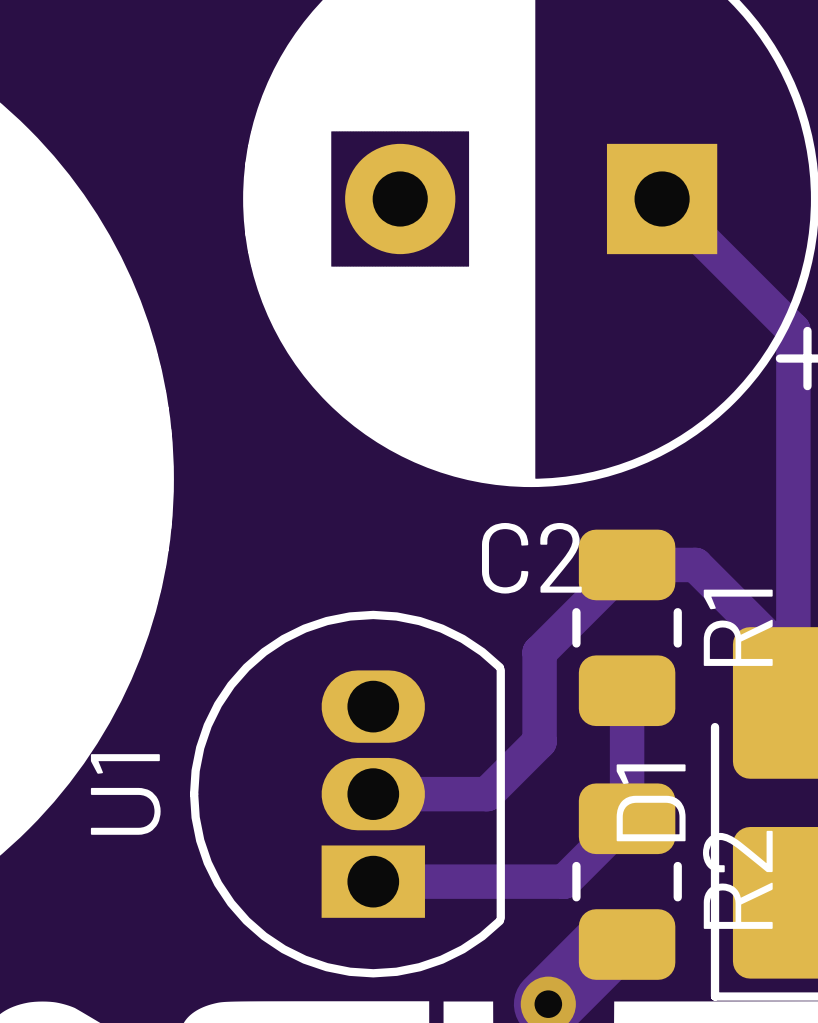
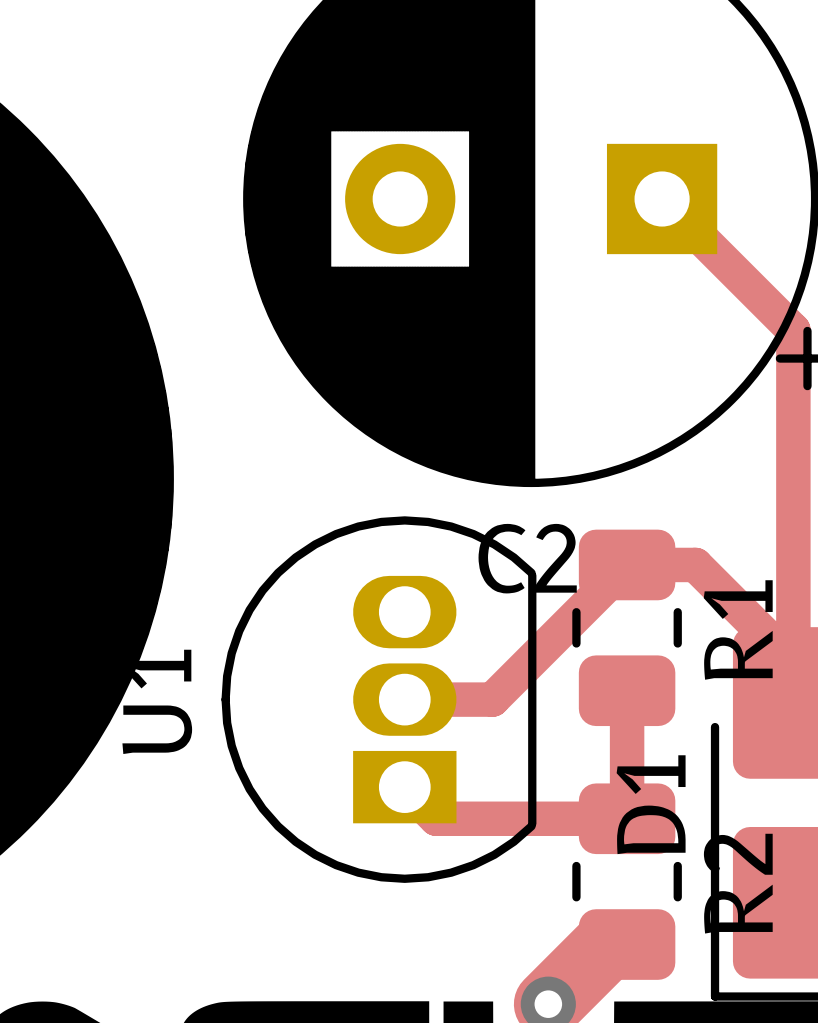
track: (539, 652) (539, 741) (487, 794) (373, 794) -> (539, 652) (492, 699) (404, 699)
U1 position: (347, 794) -> (378, 699)
track: (627, 818) (564, 881) (373, 881) -> (627, 818) (436, 818) (404, 787)

